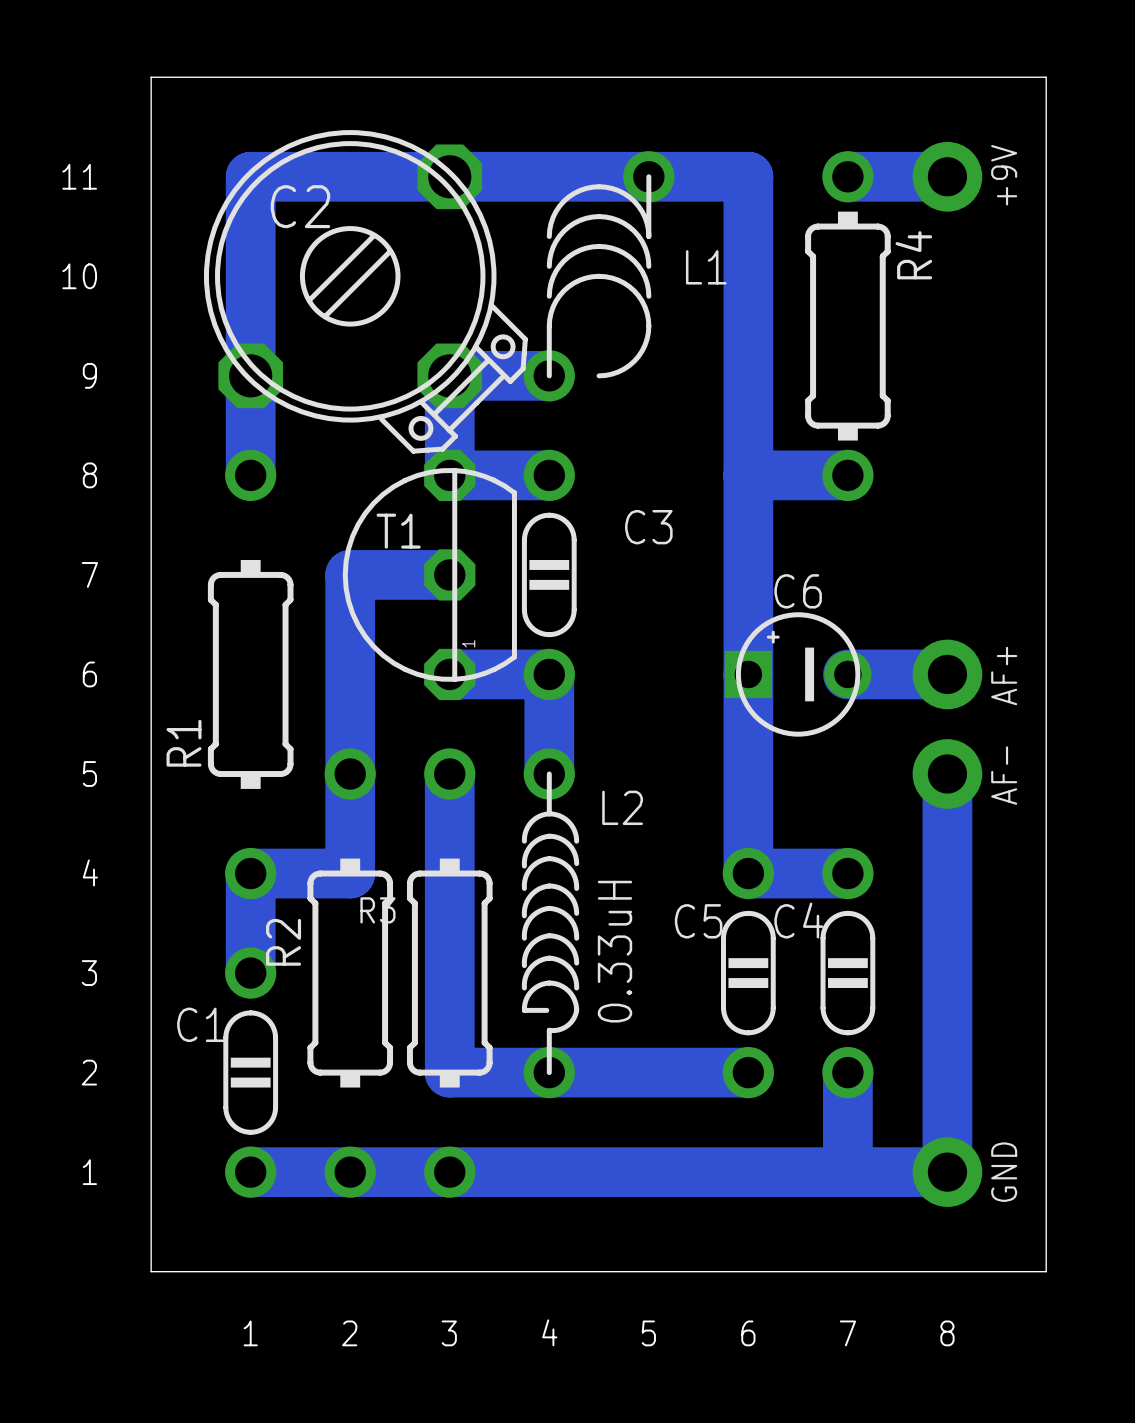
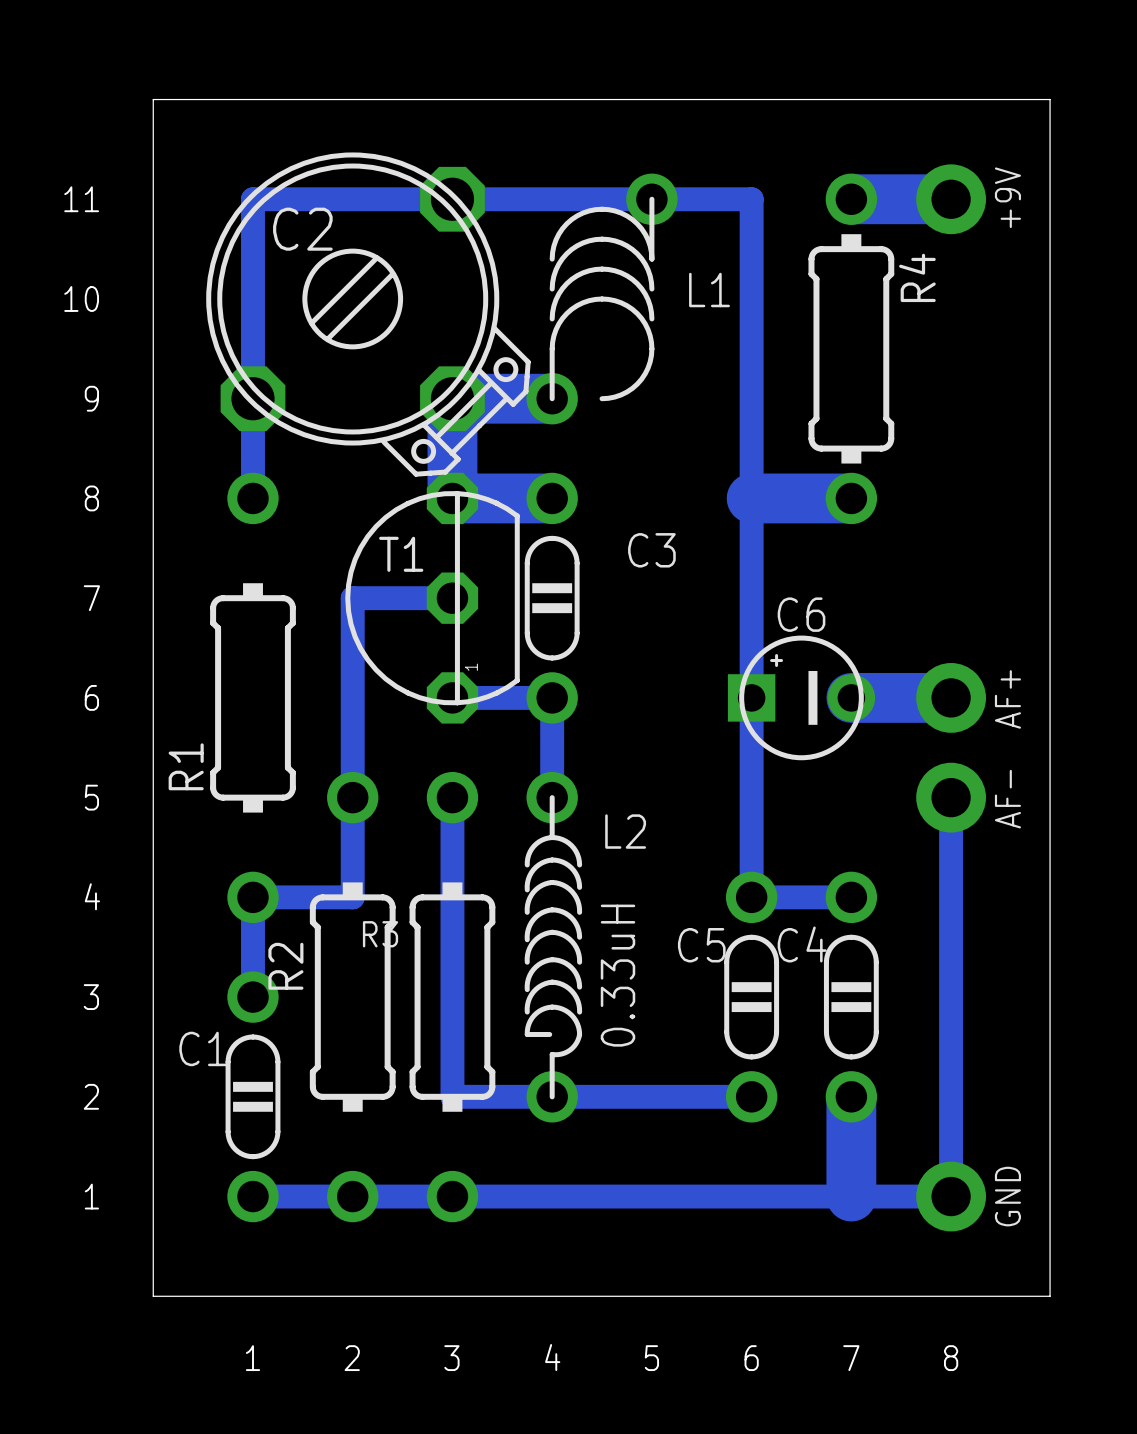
bottom track width: thick (250, 475) (250, 176) (748, 176) (748, 873) (847, 873) -> thin (252, 498) (252, 199) (751, 199) (751, 897) (851, 897)
bottom track width: thick (449, 574) (350, 574) (350, 873) (250, 873) (250, 973) -> thin (452, 598) (352, 598) (352, 897) (252, 897) (252, 997)
bottom track width: thick (449, 674) (549, 674) (549, 774) -> thin (452, 697) (552, 697) (552, 797)
bottom track width: thick (449, 774) (449, 1072) (748, 1072) -> thin (452, 797) (452, 1096) (751, 1096)
bottom track width: thick (947, 774) (947, 1172) (250, 1172) -> thin (951, 797) (951, 1196) (252, 1196)

